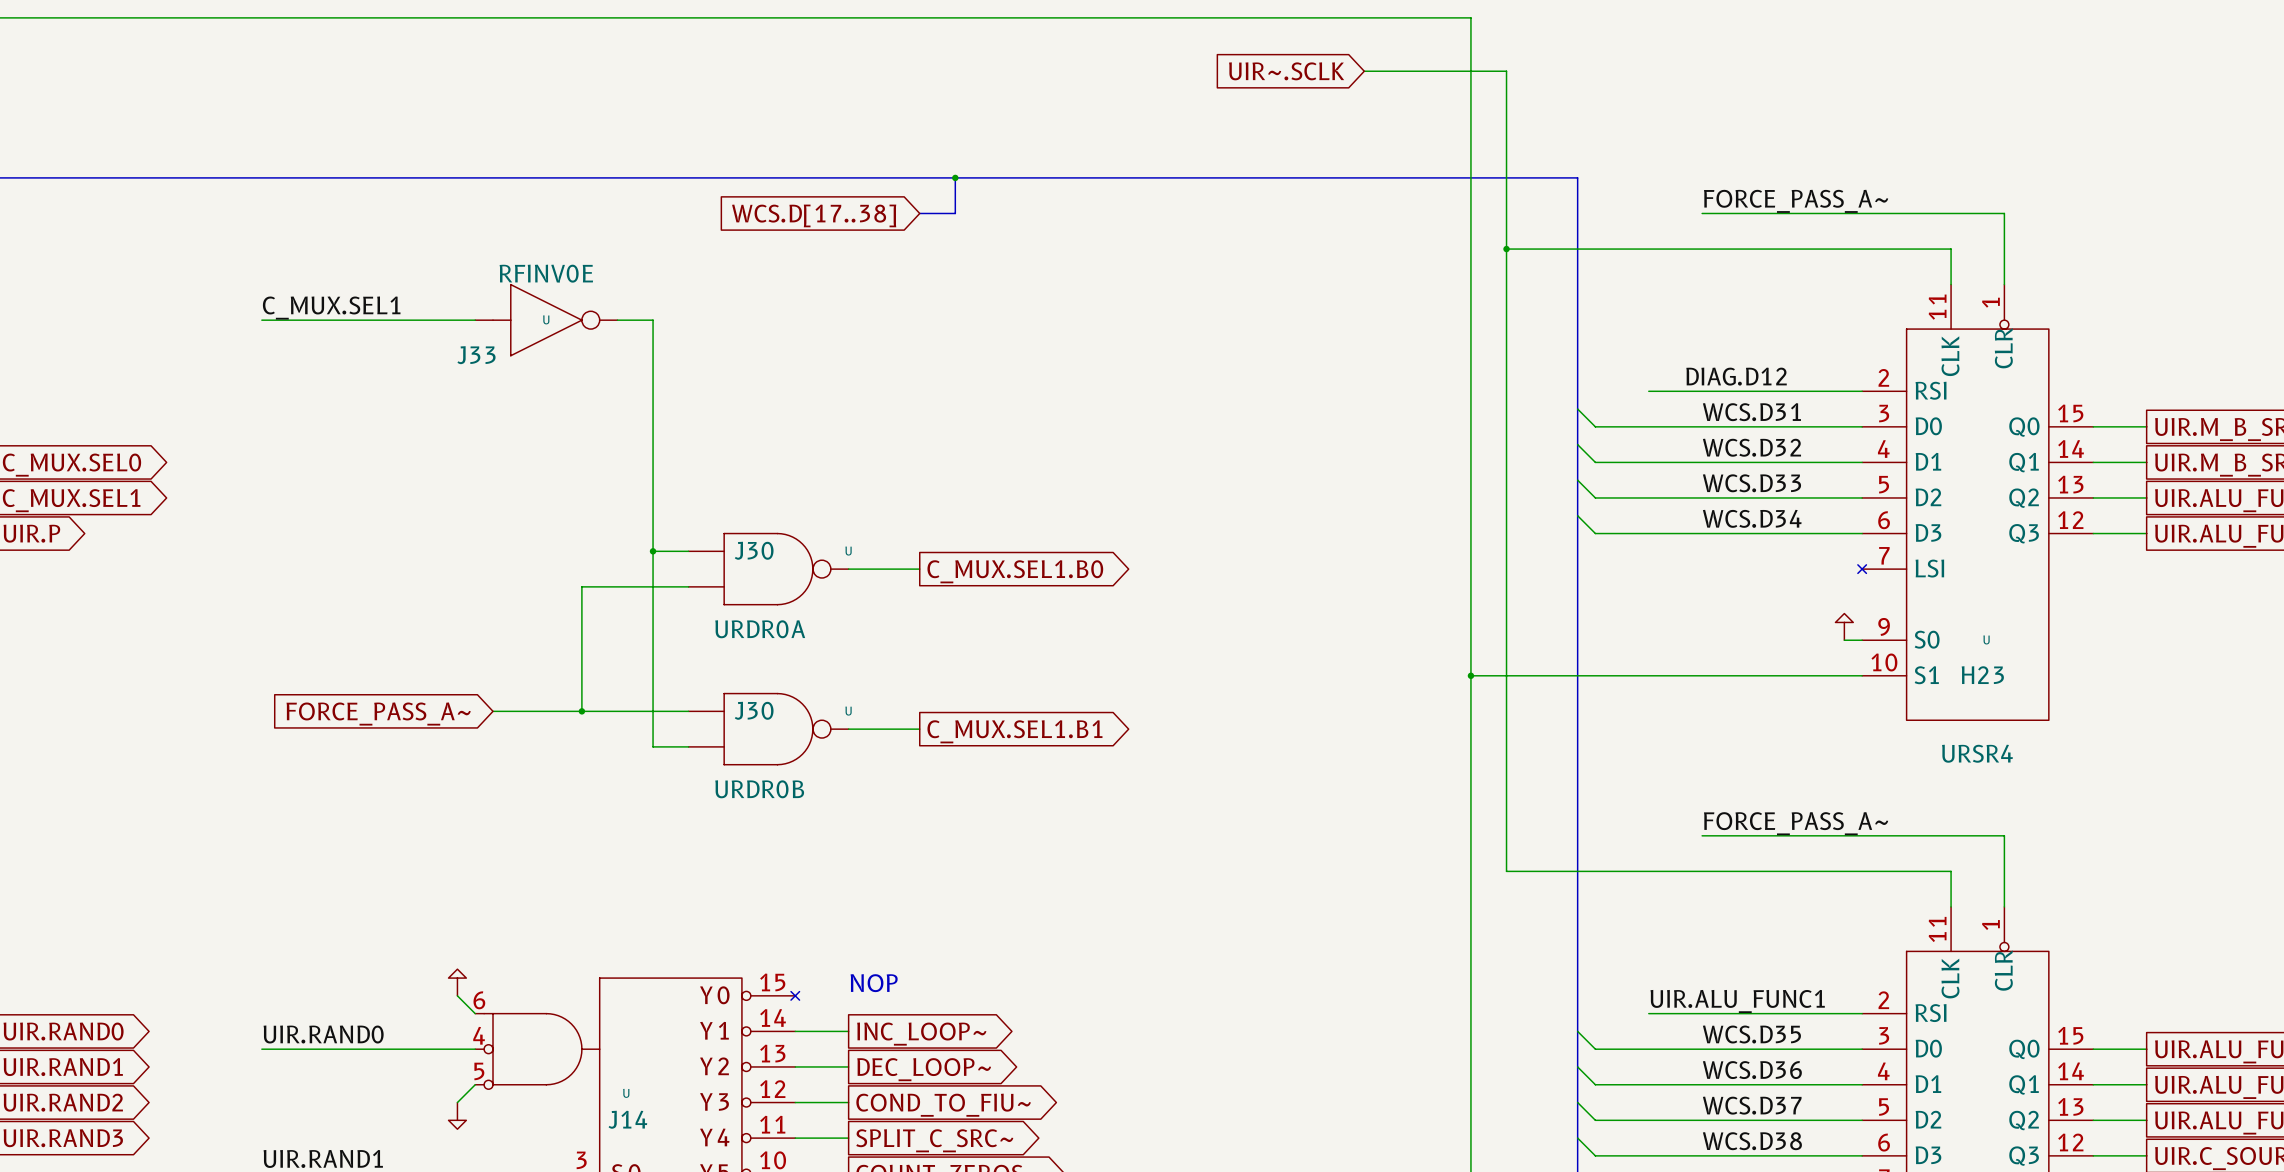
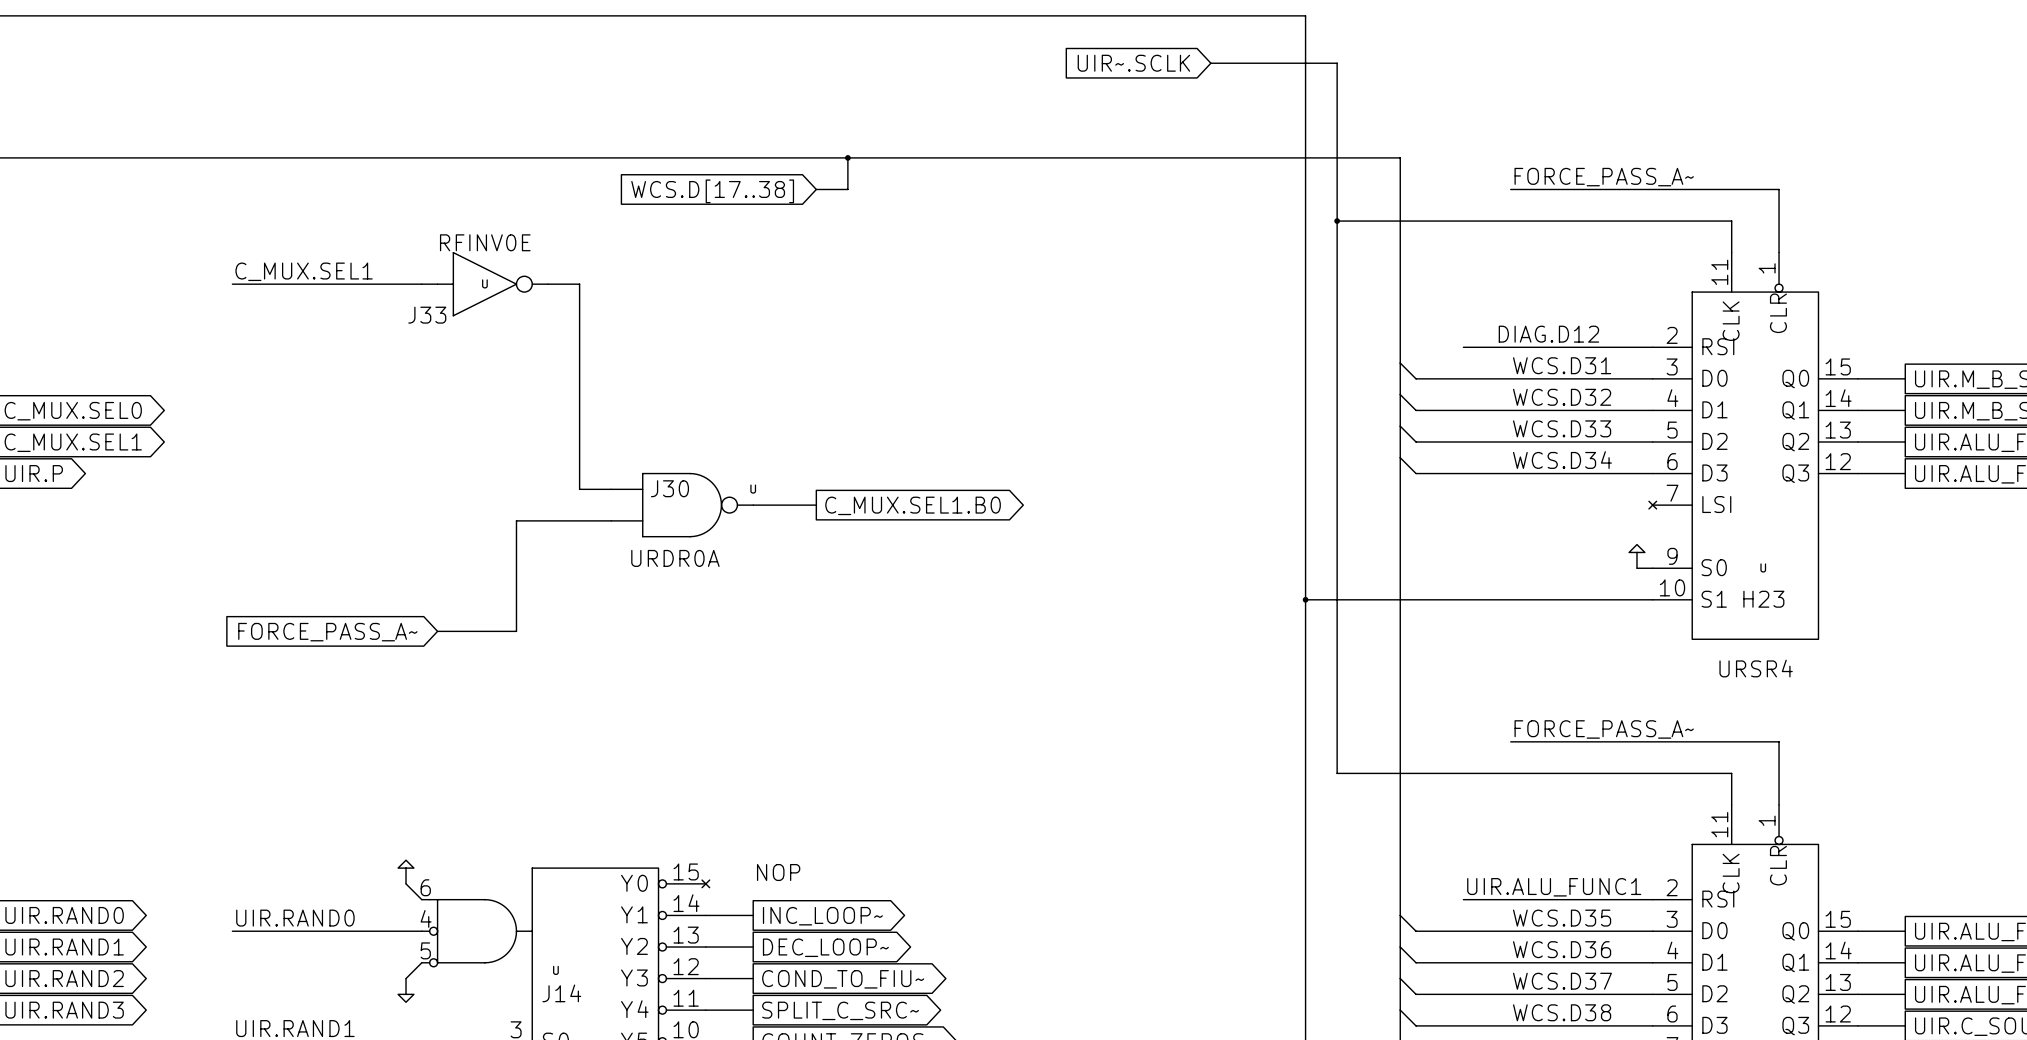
wire: (653, 551) (653, 746) (688, 746) -> none
junction: (653, 551) -> none
wire: (581, 711) (688, 711) -> none
junction: (581, 711) -> none
U: (768, 729) -> none
wire: (848, 729) (919, 729) -> none
global label: C_MUX.SEL1.B1 (1014, 731) -> none

